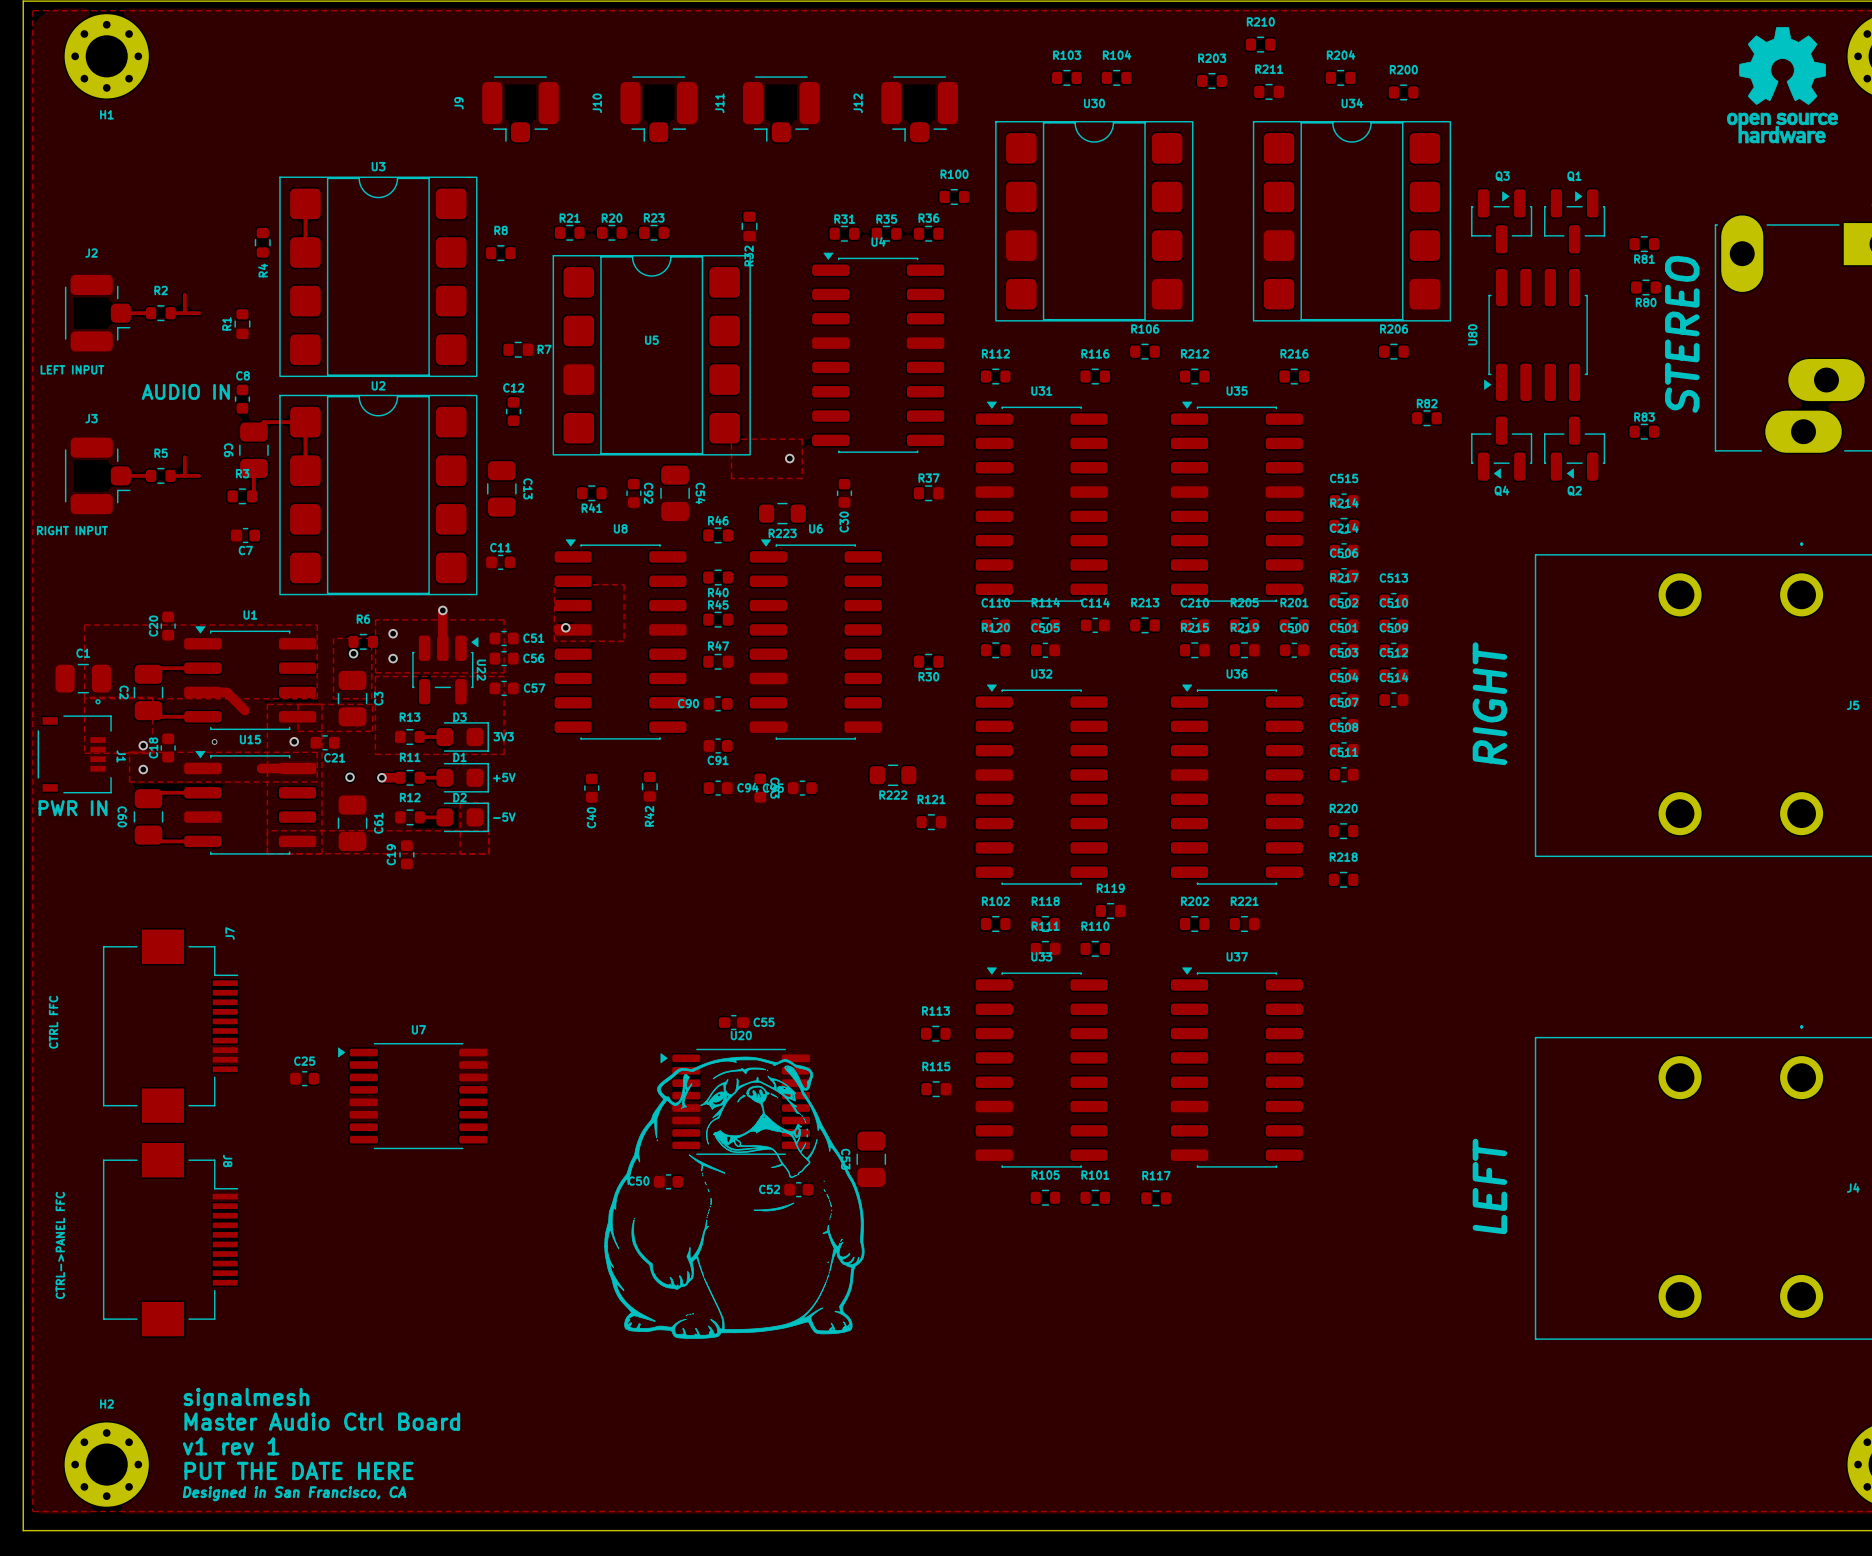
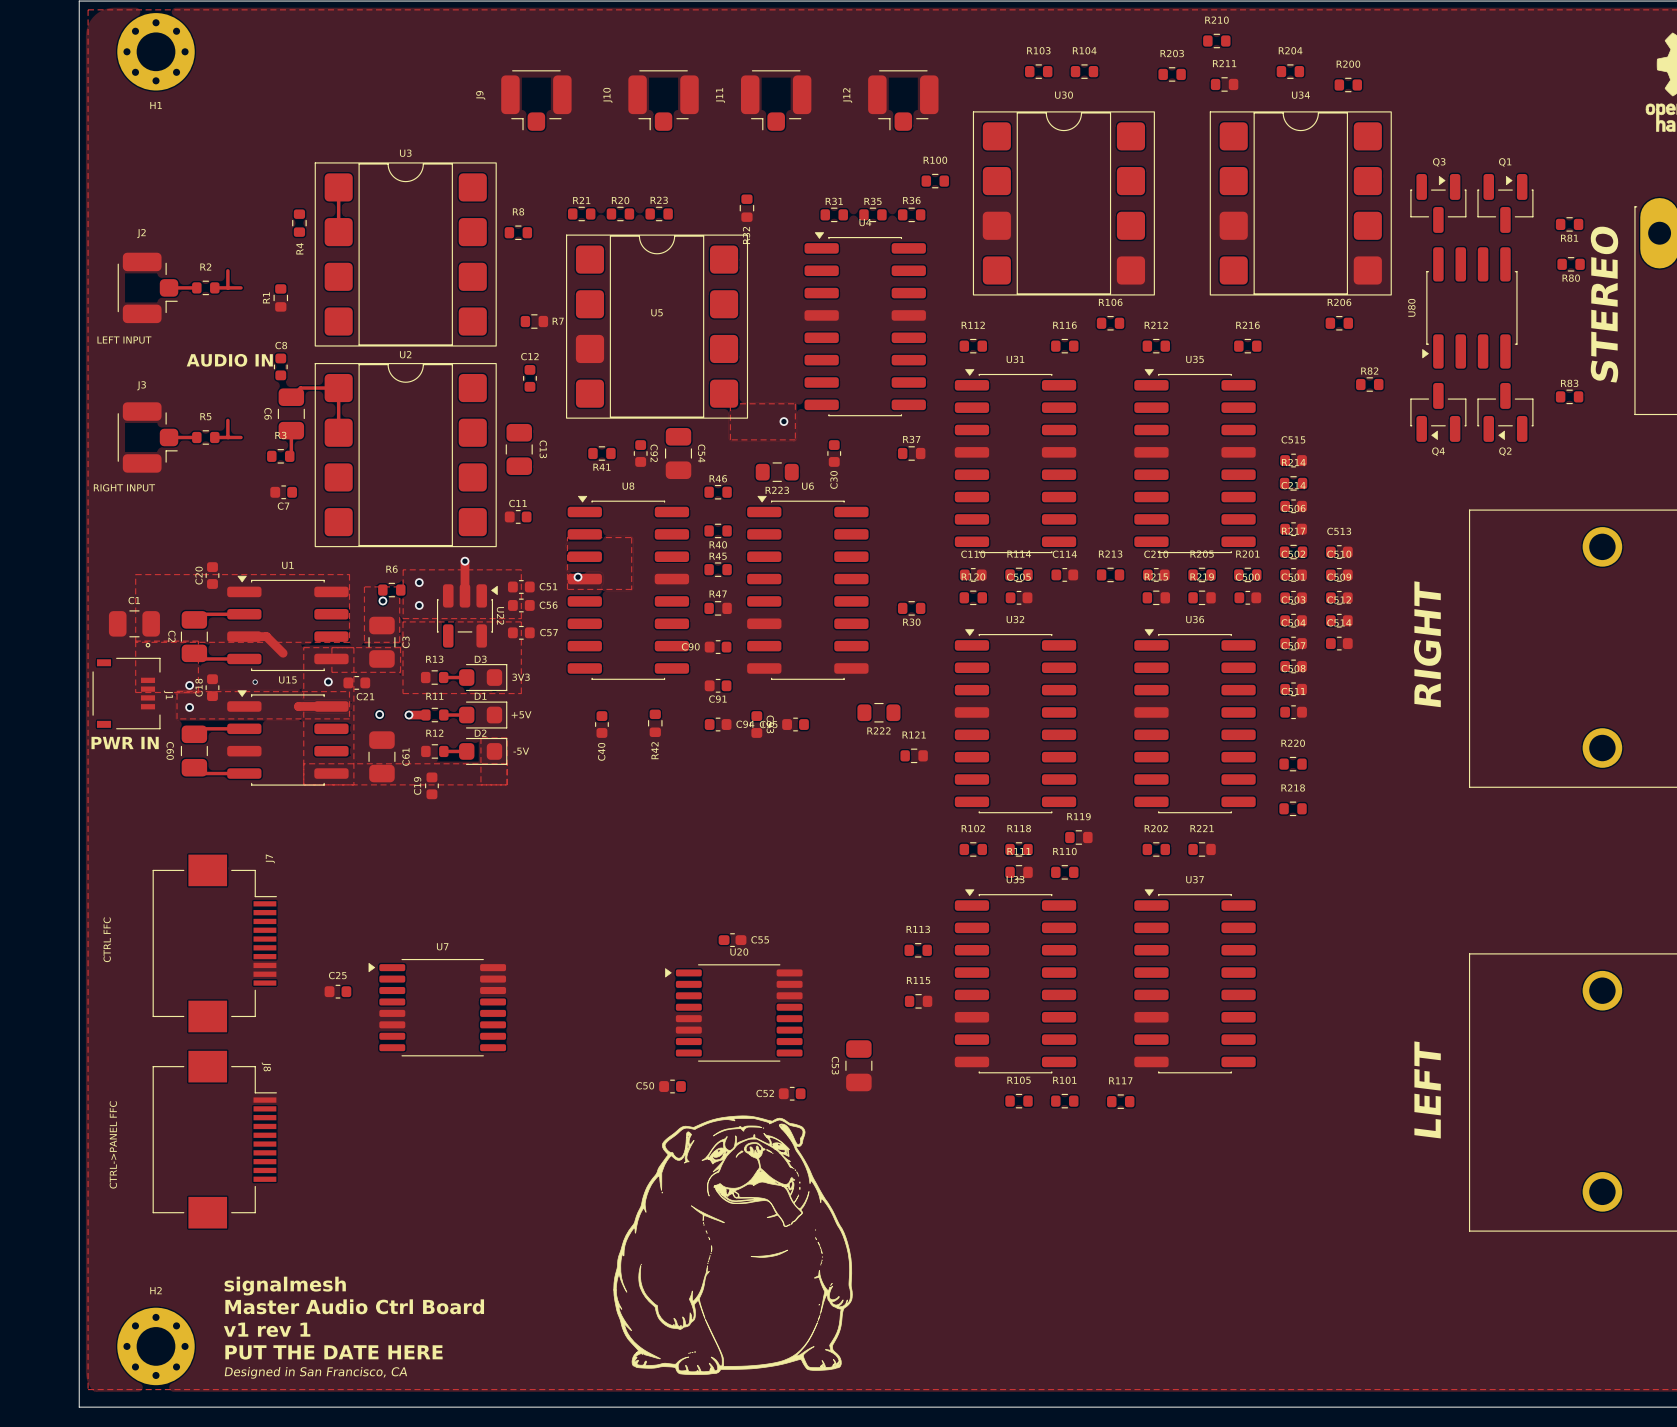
drawing position: (734, 1197) -> (733, 1245)

